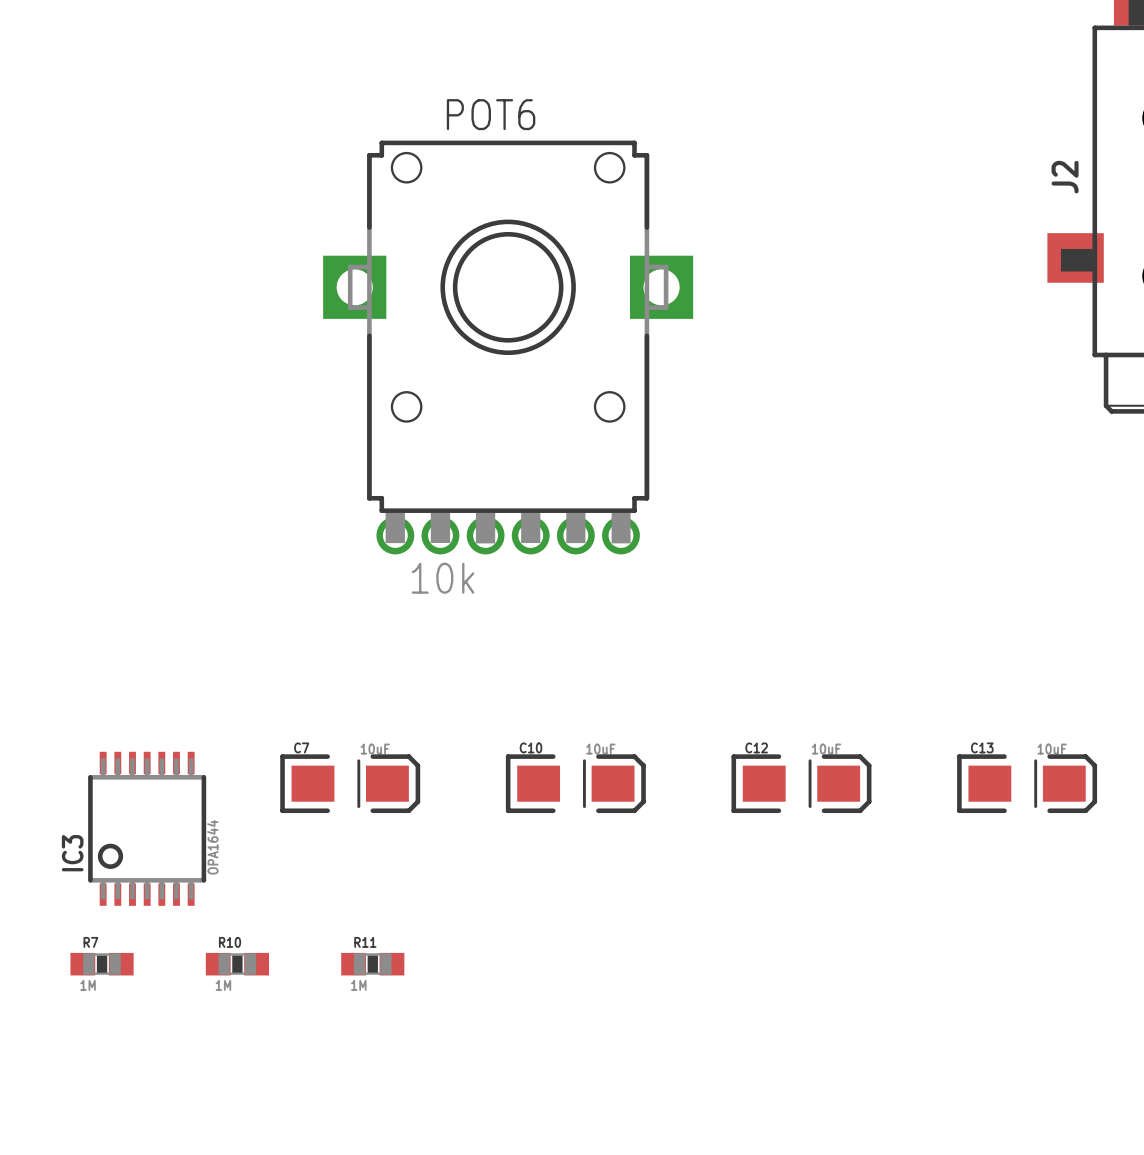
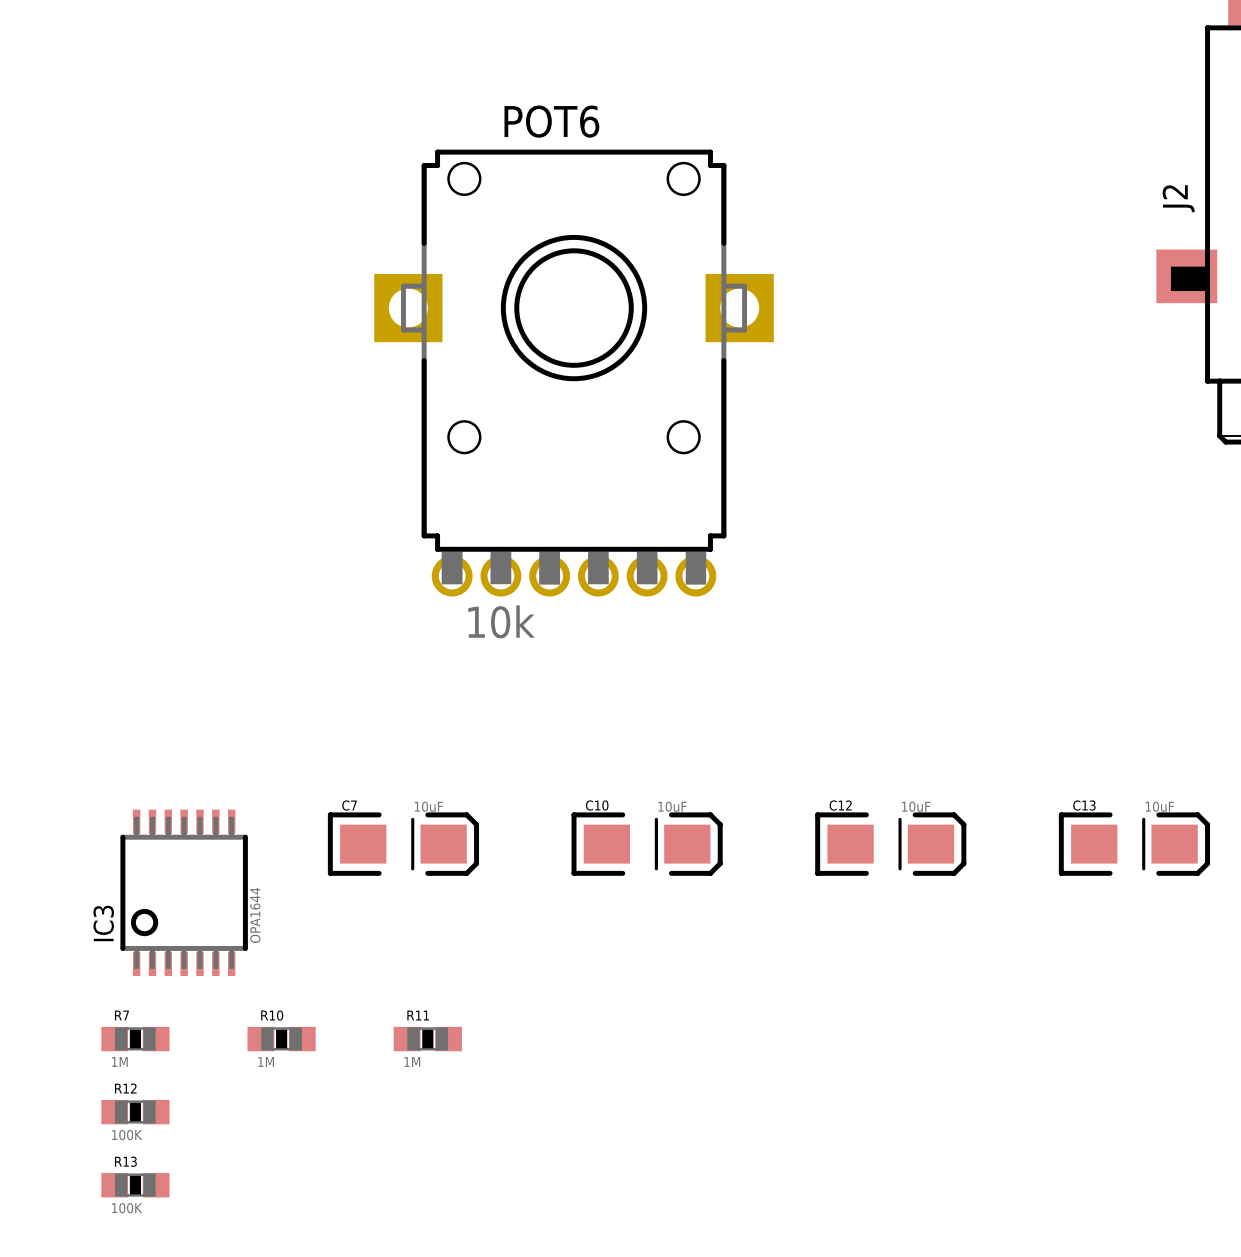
R12: none -> 100K (135, 1112)
R13: none -> 100K (135, 1185)

